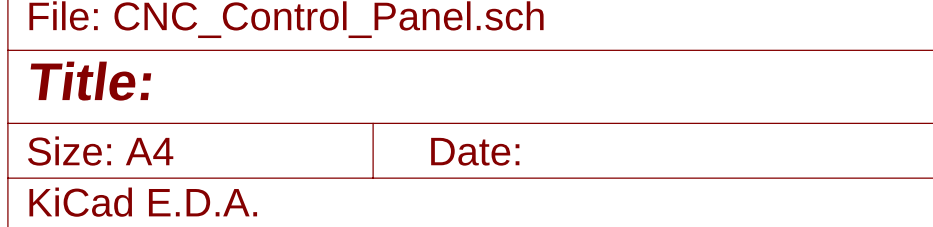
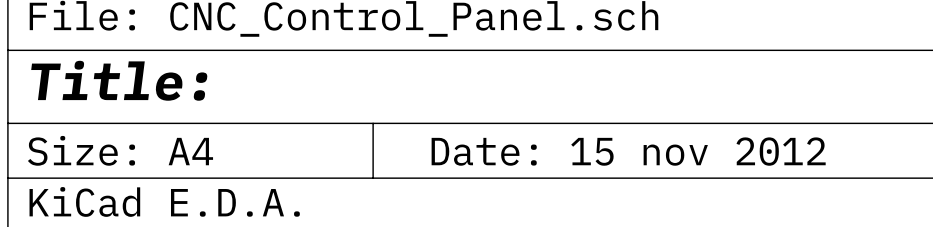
title block: Date: (475, 151) -> Date: 15 nov 2012 (628, 151)

